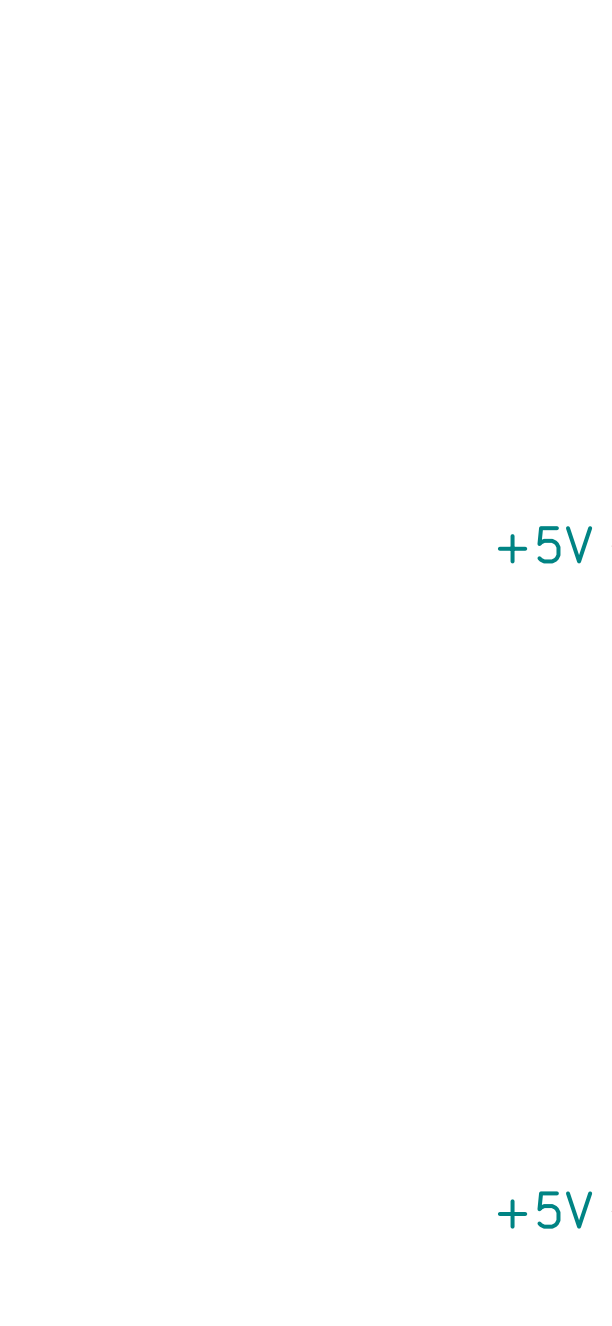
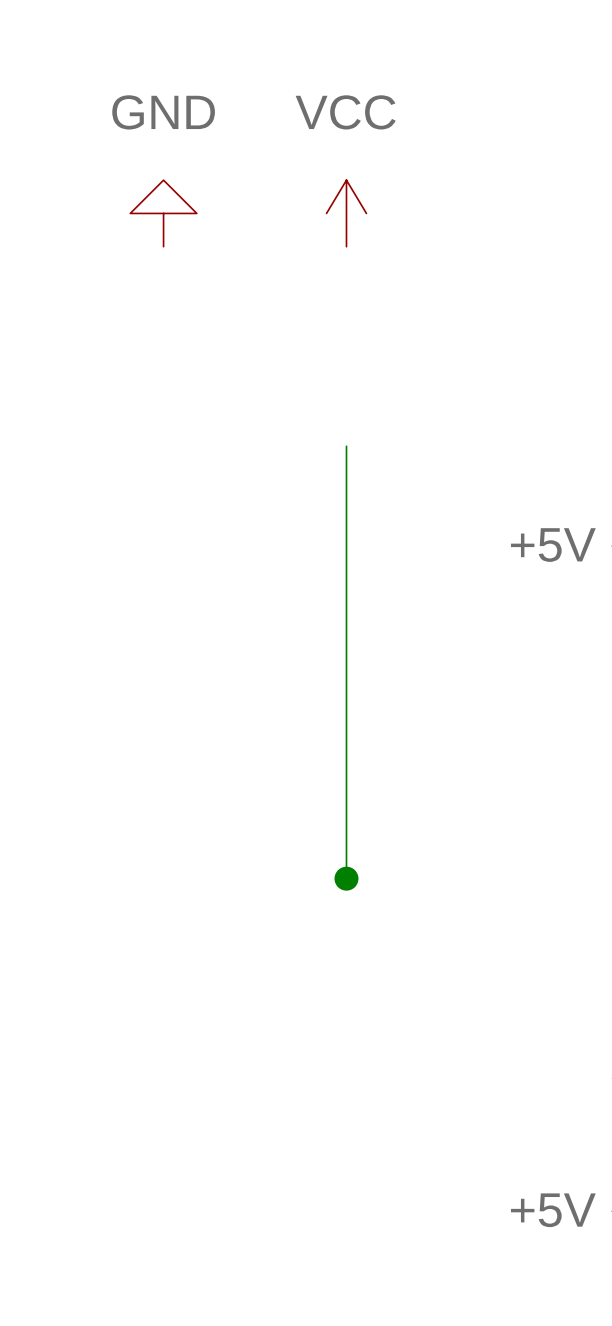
power symbol: none -> GND (163, 213)
power symbol: none -> VCC (346, 213)
wire: none -> (346, 446) (346, 878)
junction: none -> (346, 878)

